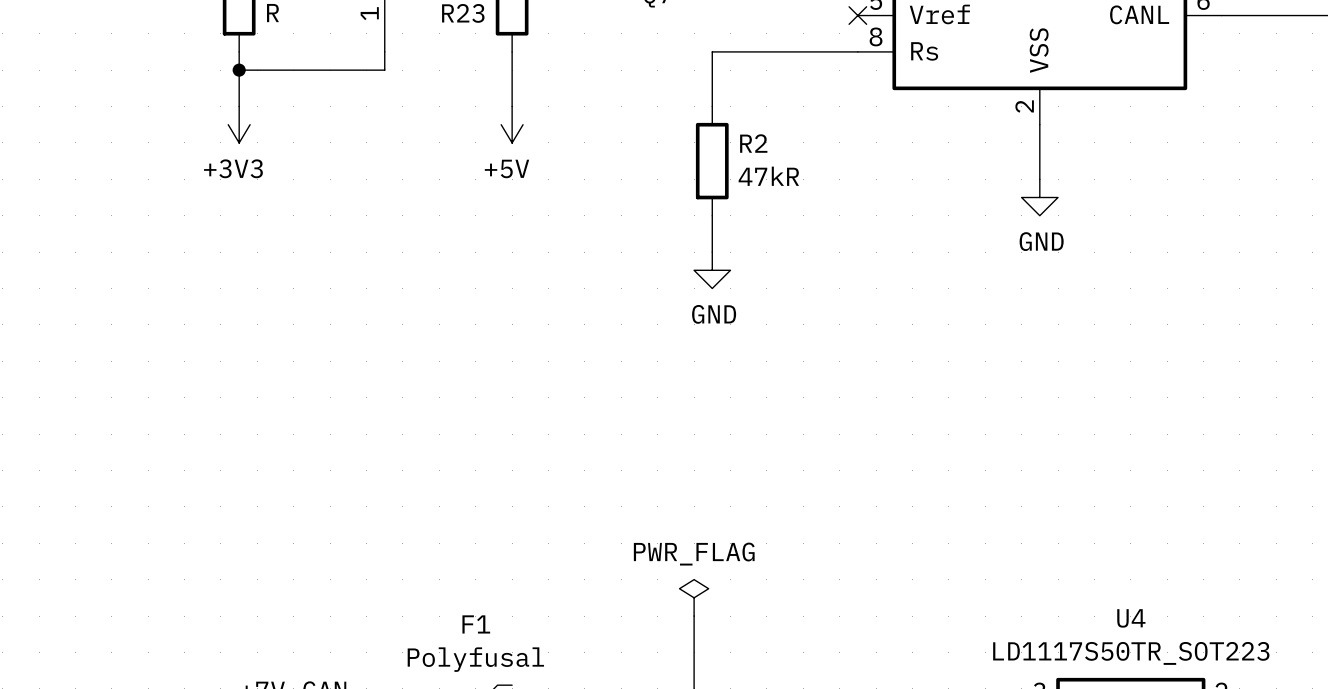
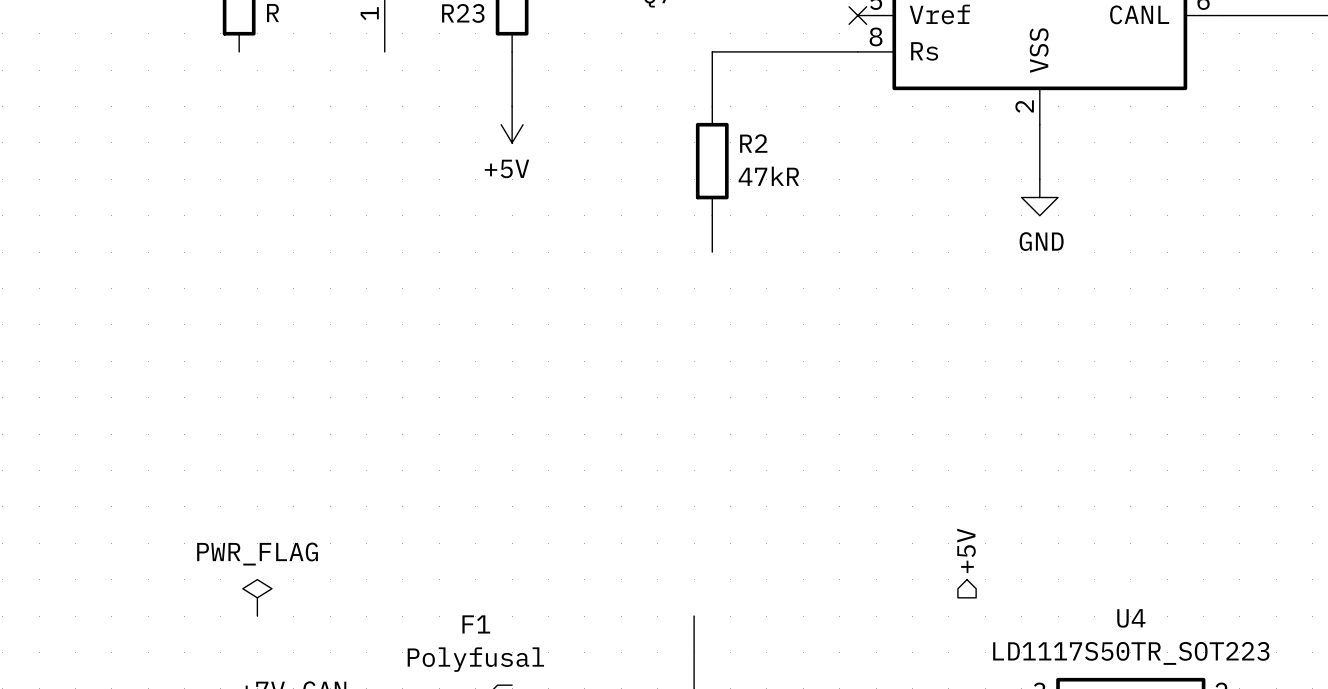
wire: (239, 51) (239, 106) -> none
wire: (384, 51) (384, 70) (239, 70) -> none
junction: (239, 70) -> none
power symbol: +3V3 (239, 124) -> none
power symbol: GND (712, 270) -> none
hierarchical label: none -> +5V (966, 550)
power symbol: none -> PWR_FLAG (257, 597)
power symbol: PWR_FLAG (694, 597) -> none

